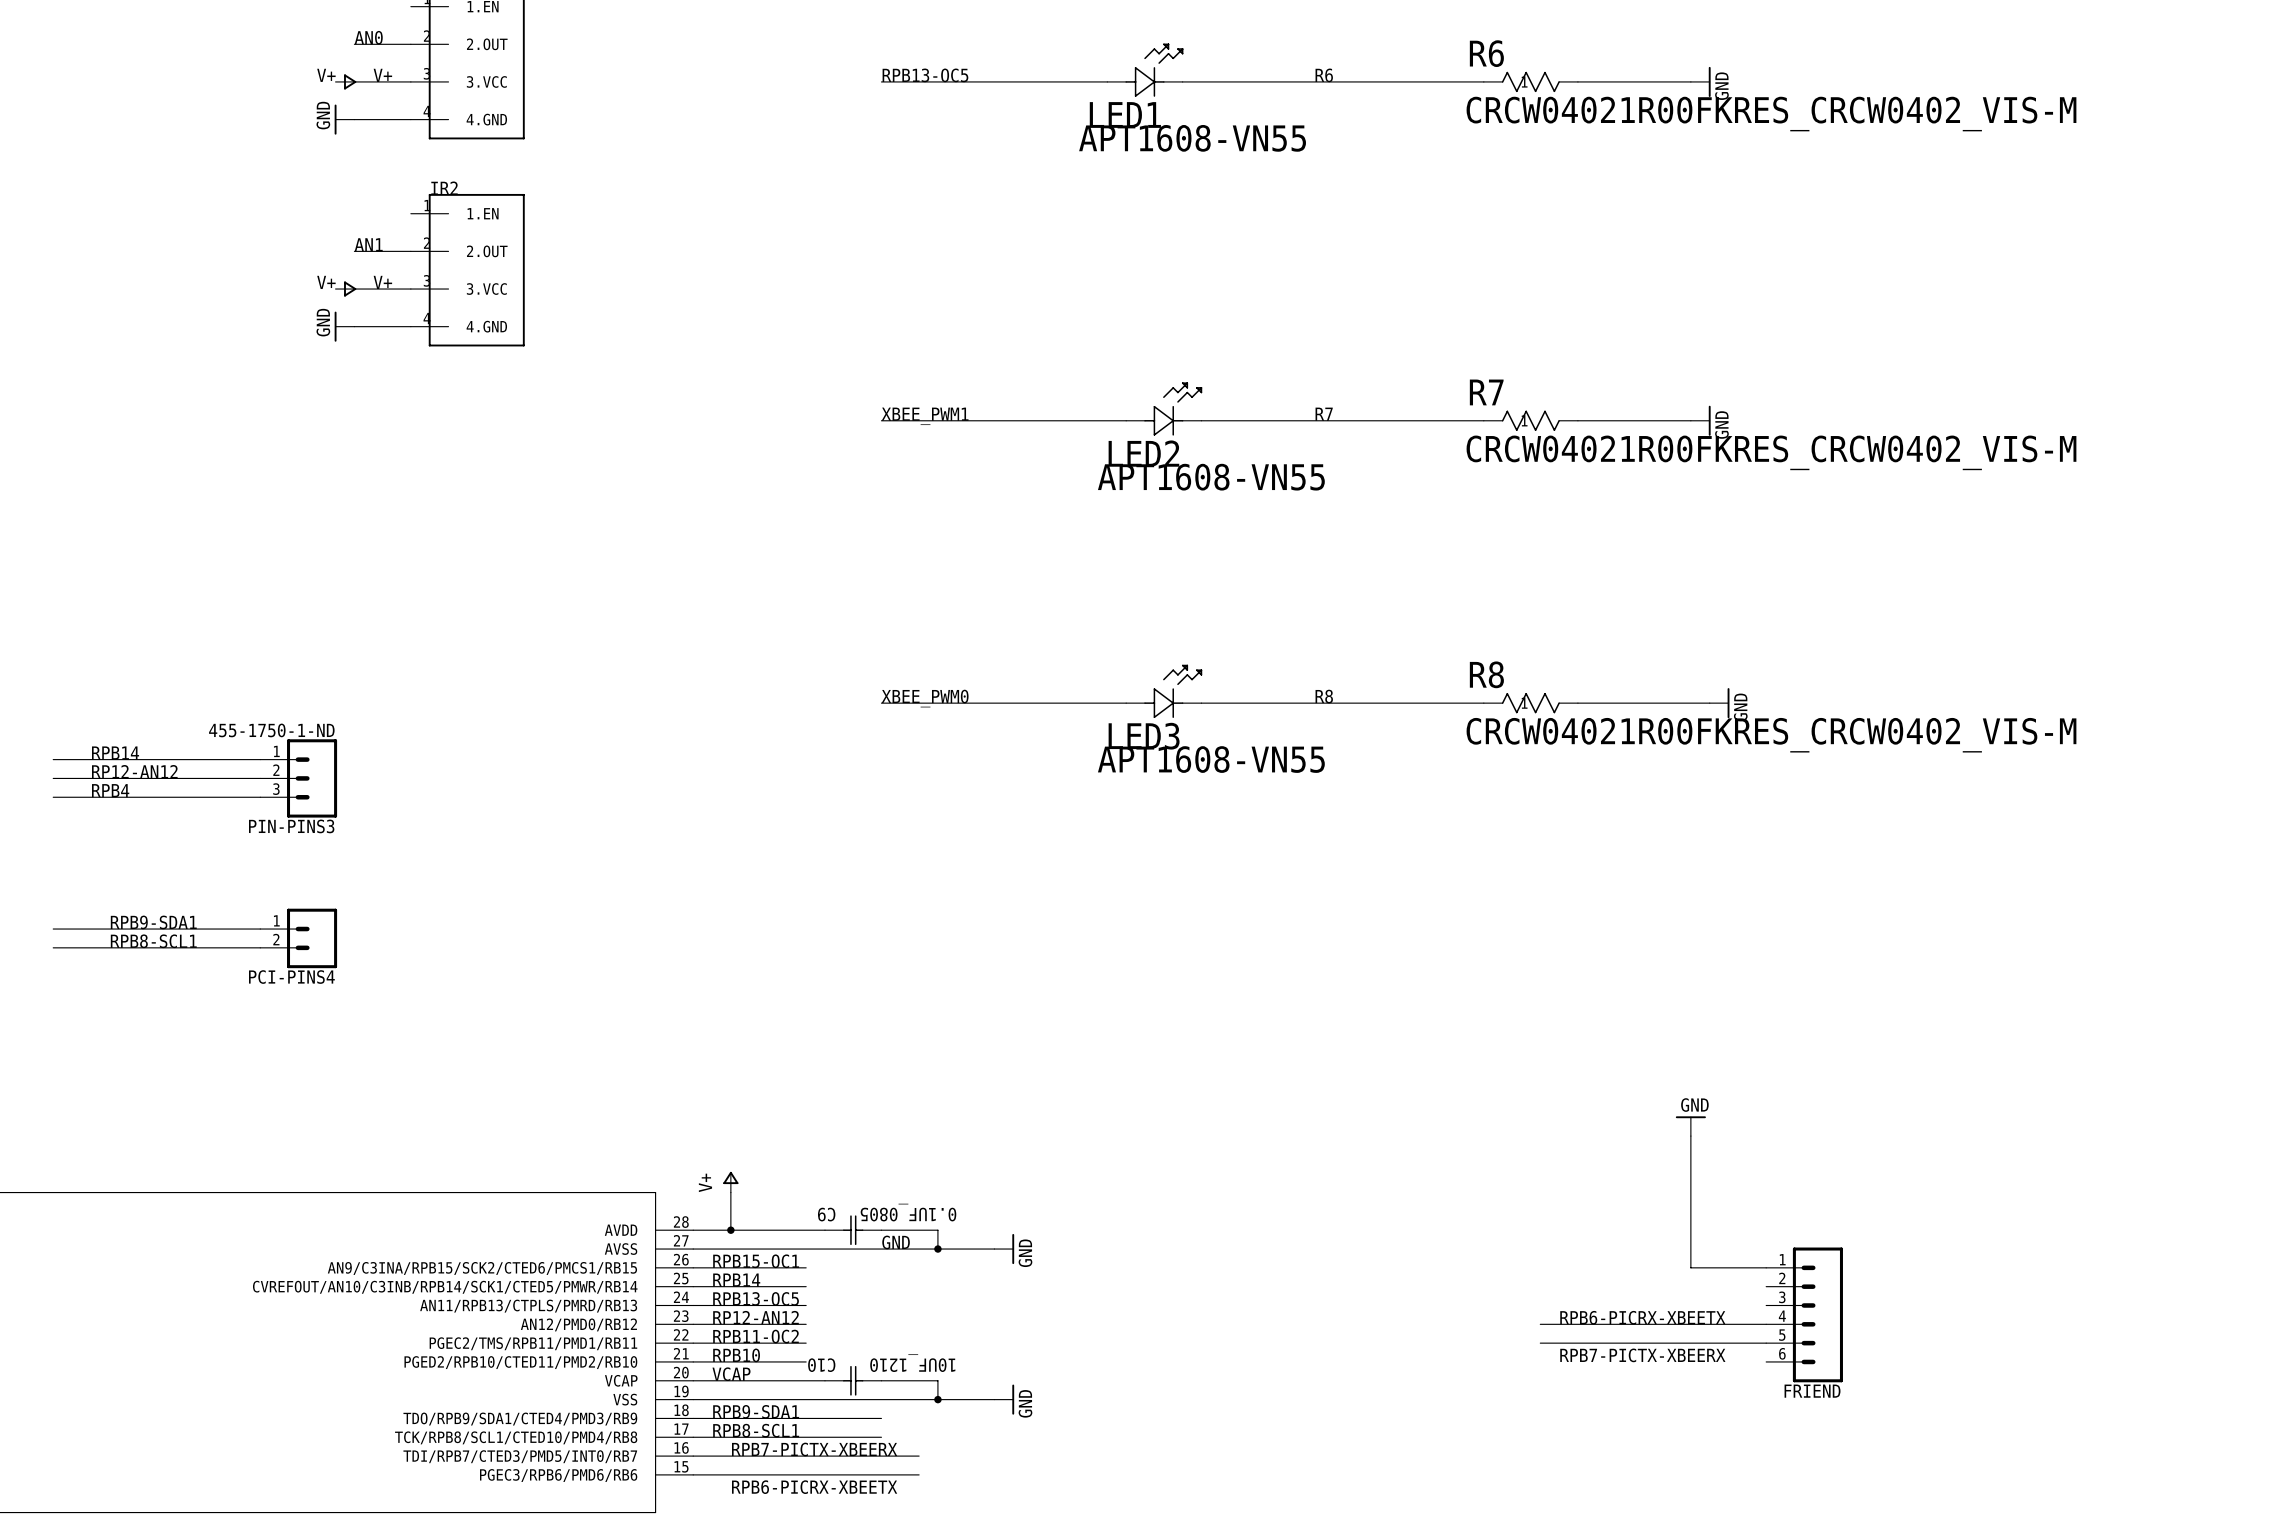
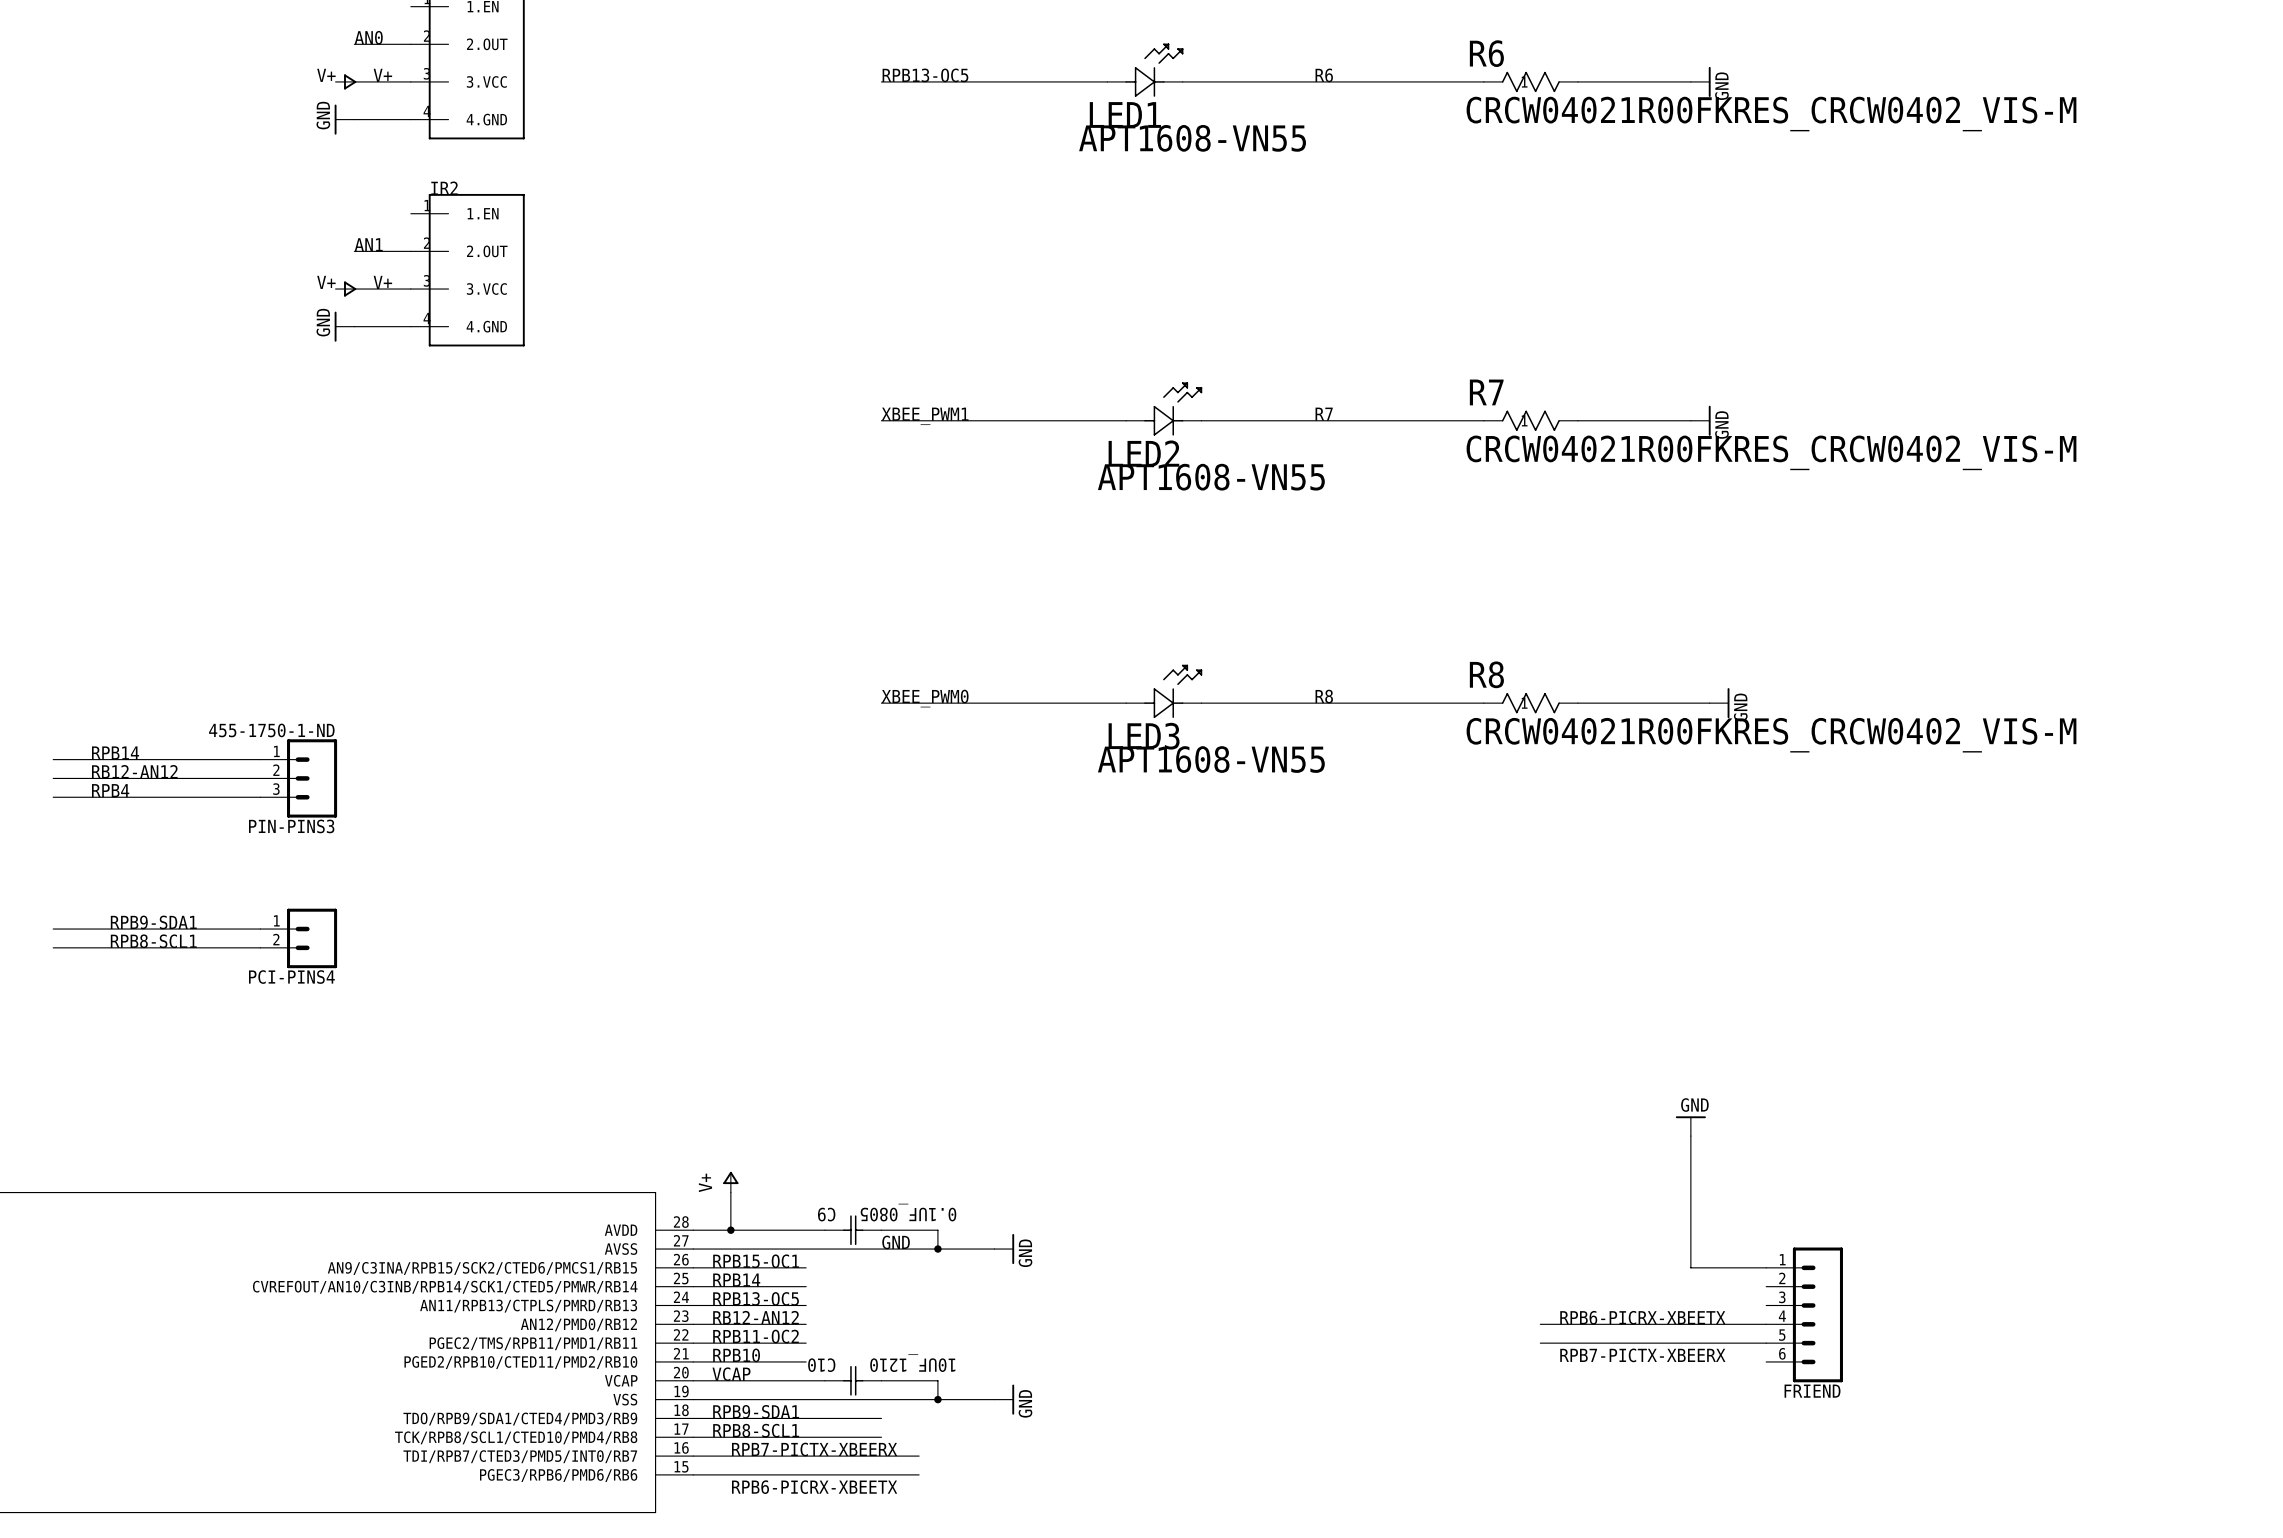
label: RP12-AN12 (134, 771) -> RB12-AN12 (134, 771)
label: RP12-AN12 (755, 1317) -> RB12-AN12 (755, 1317)

